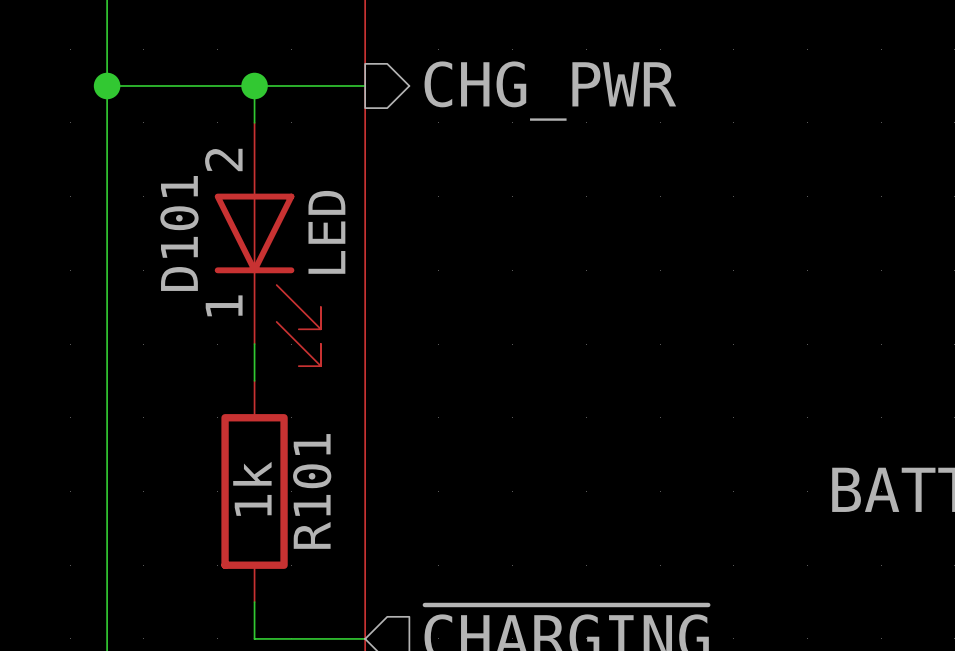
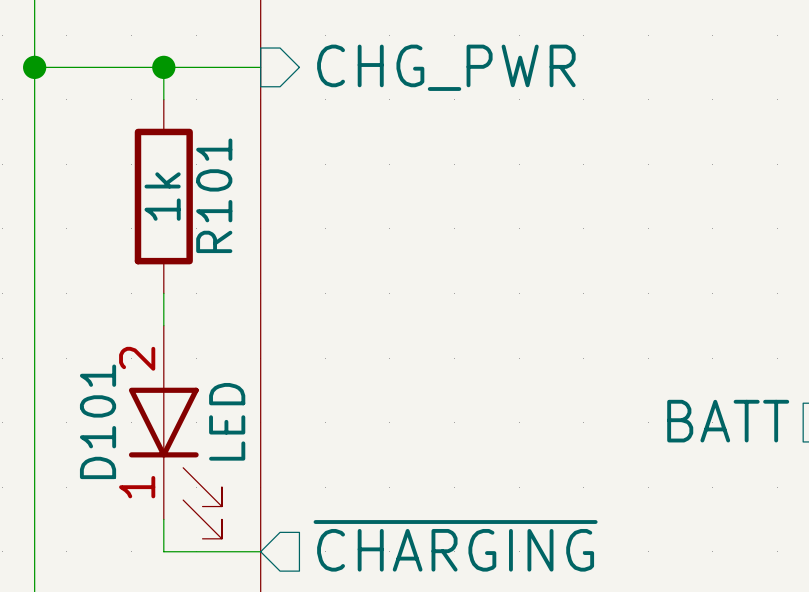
D101 position: (267, 244) -> (175, 432)
R101 position: (254, 491) -> (163, 196)

